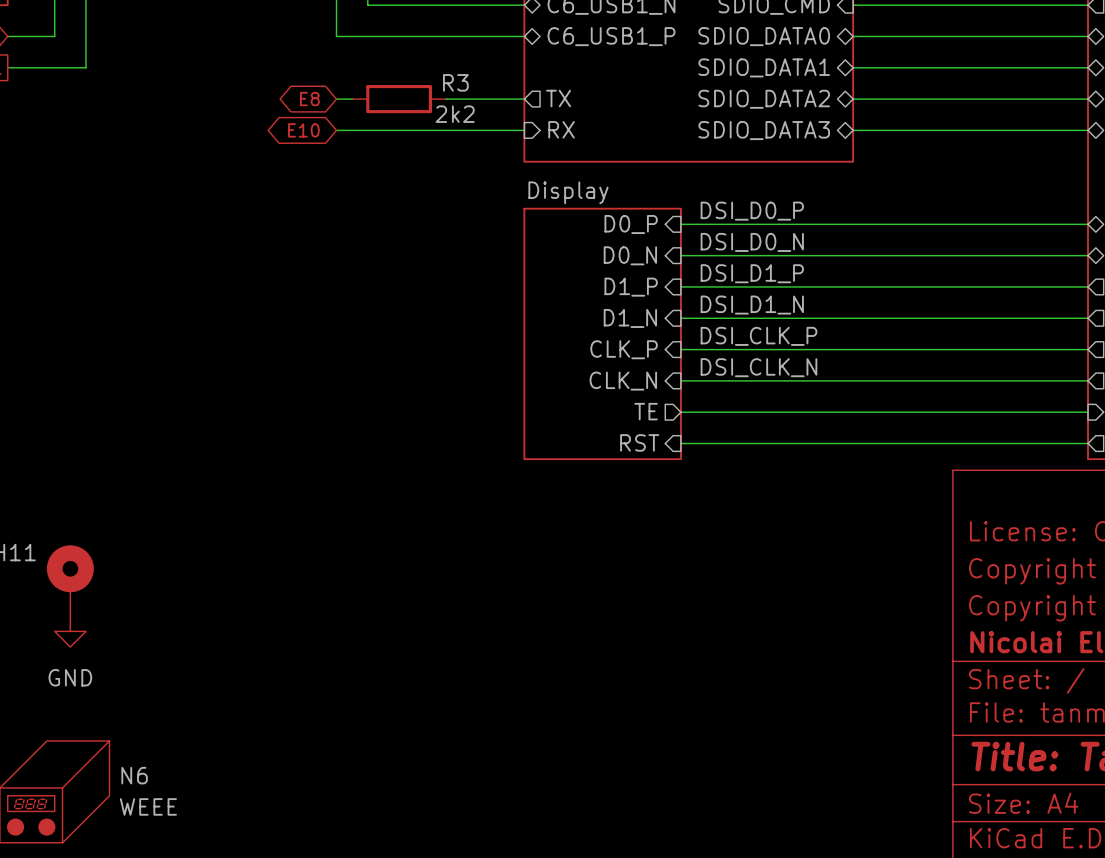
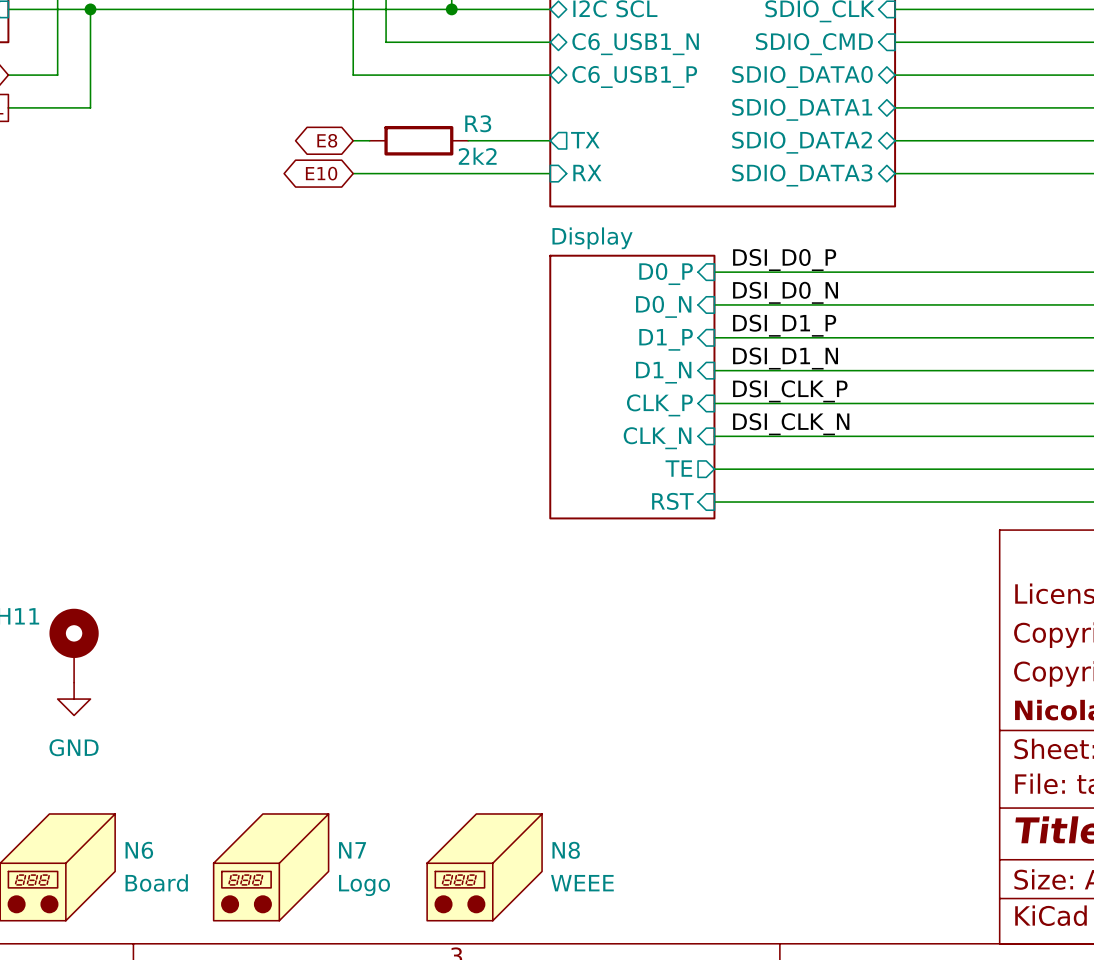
N7: none -> Logo (271, 867)
N8: none -> WEEE (484, 867)
N6 value: WEEE (148, 806) -> Board (156, 882)

